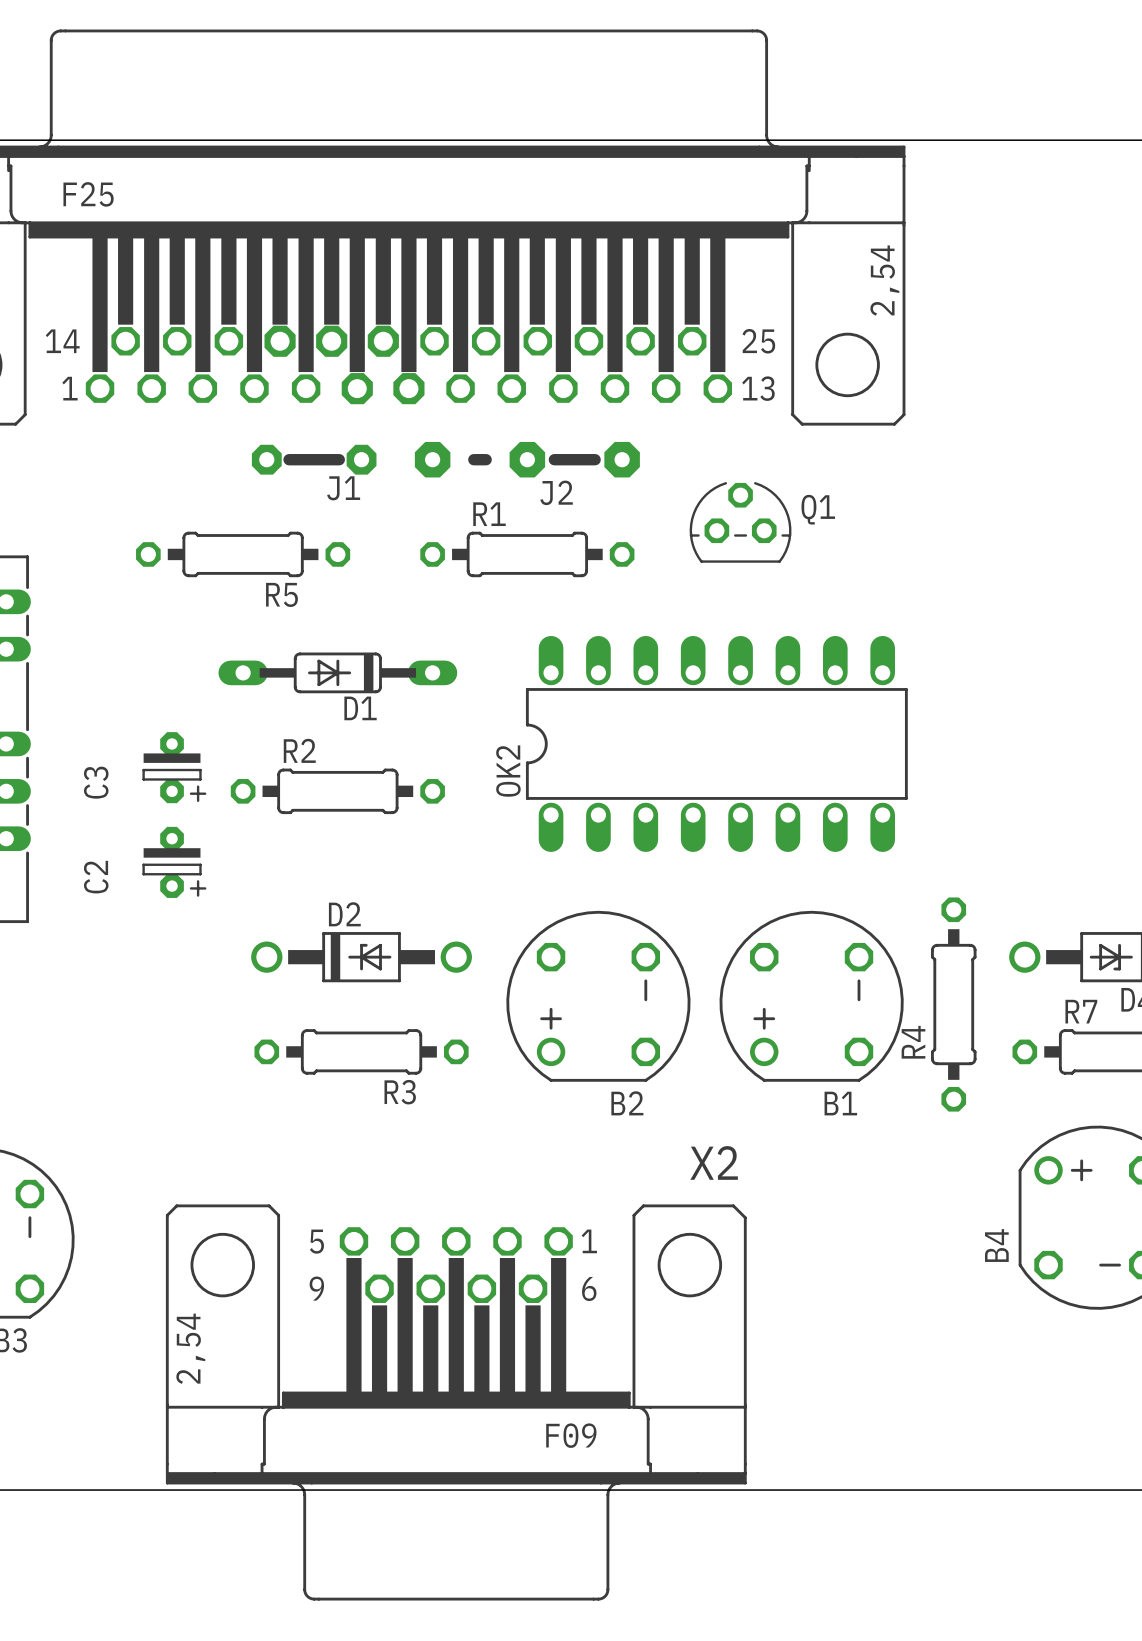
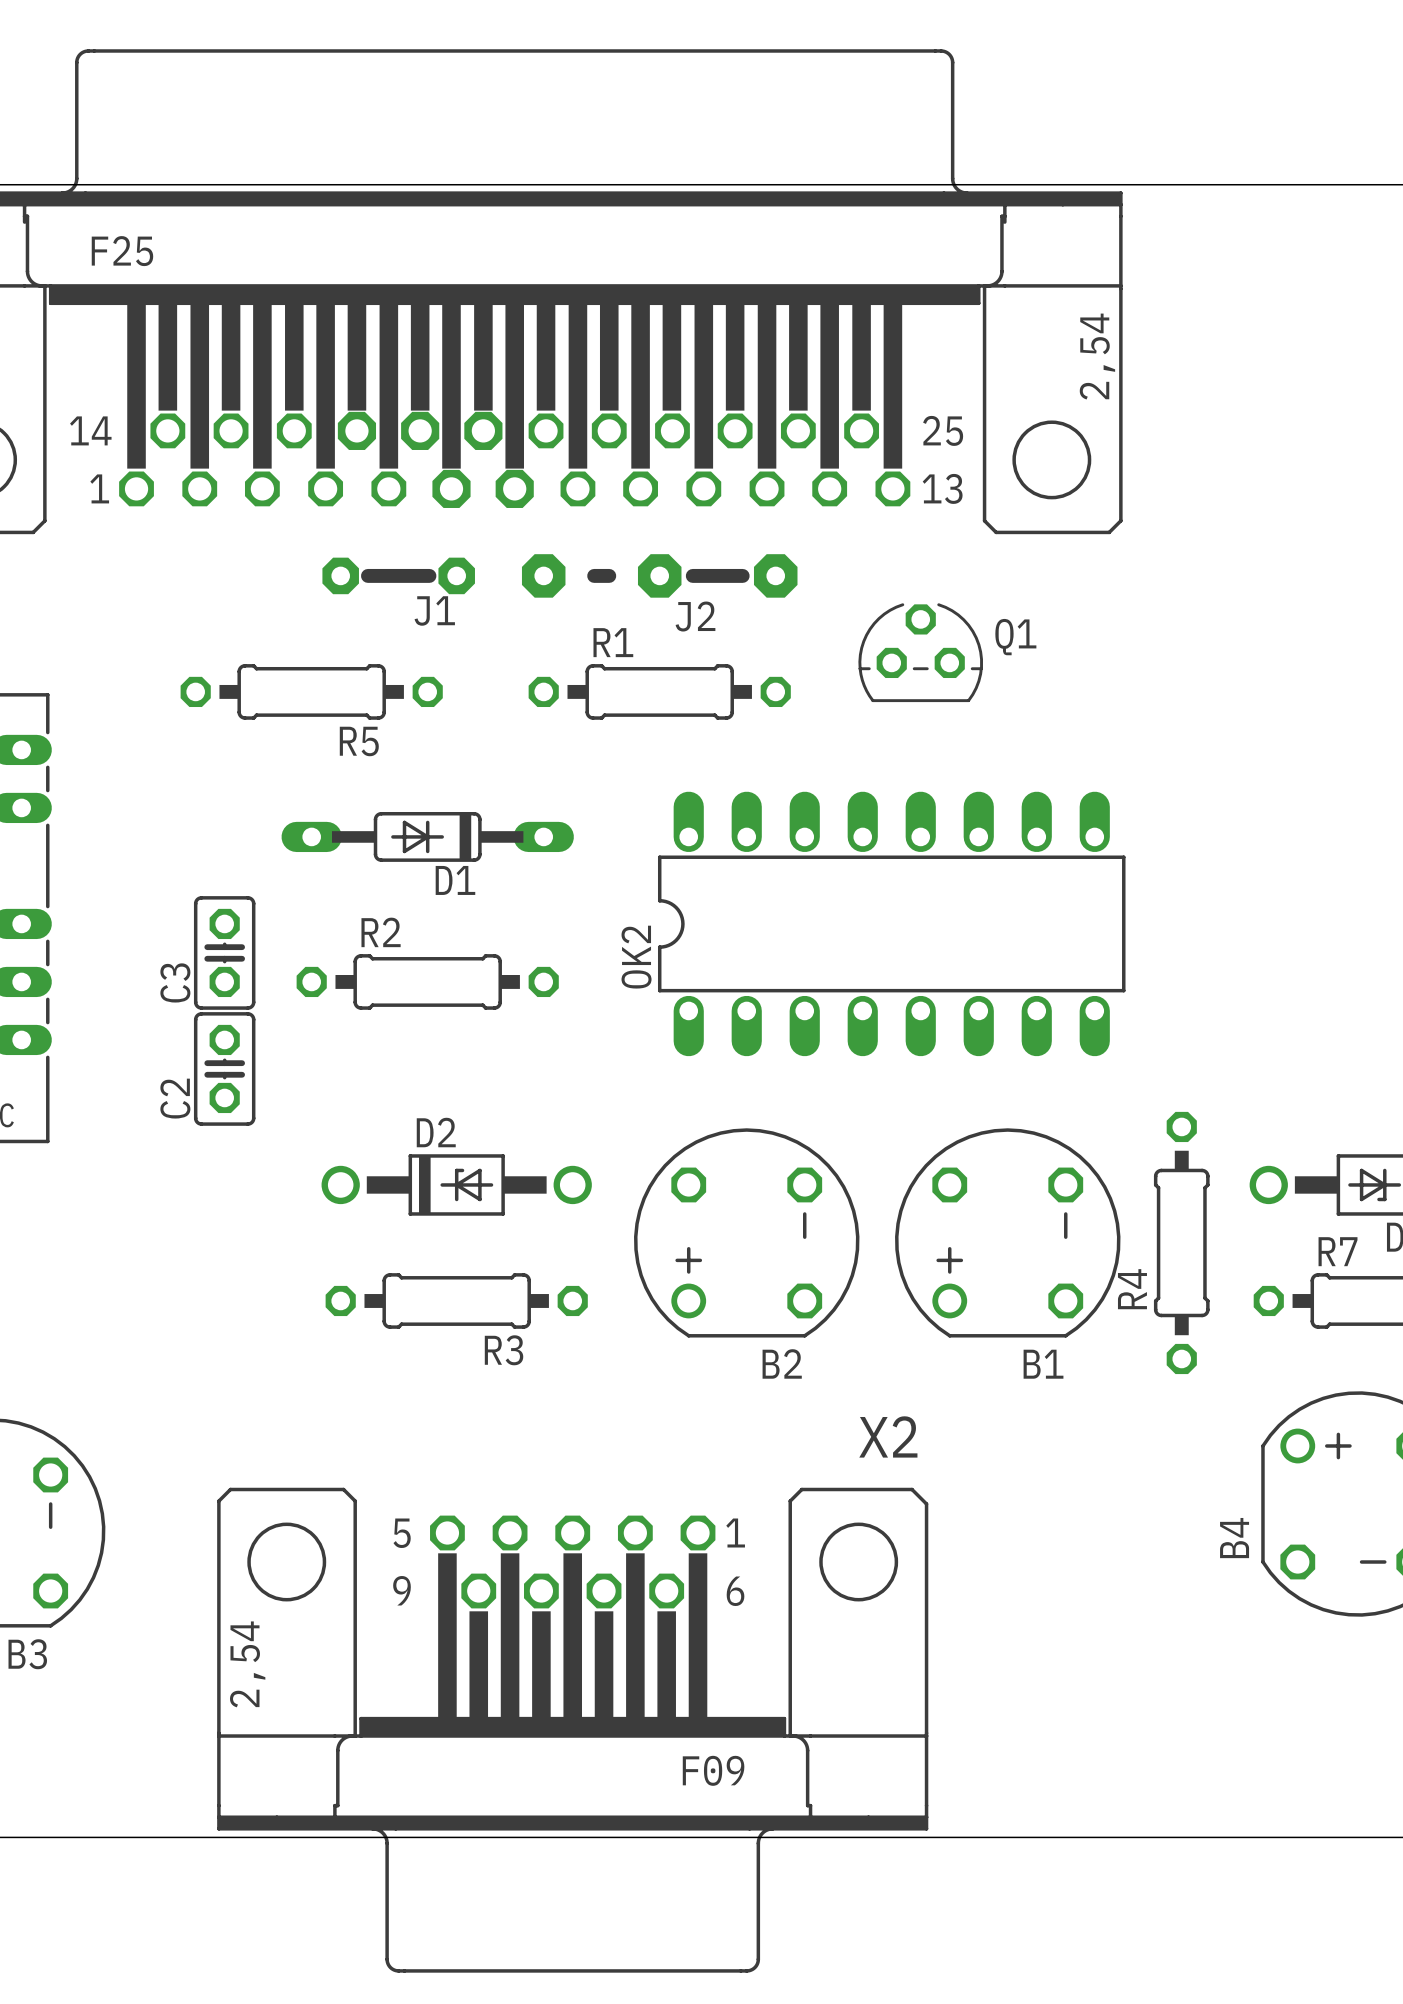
C3 footprint: [142, 732, 207, 804] -> [193, 896, 256, 1010]
C3 name position: C3 (96, 782) -> C3 (175, 982)
C2 footprint: [142, 826, 207, 898] -> [193, 1012, 256, 1126]
C2 name position: C2 (96, 877) -> C2 (175, 1098)

